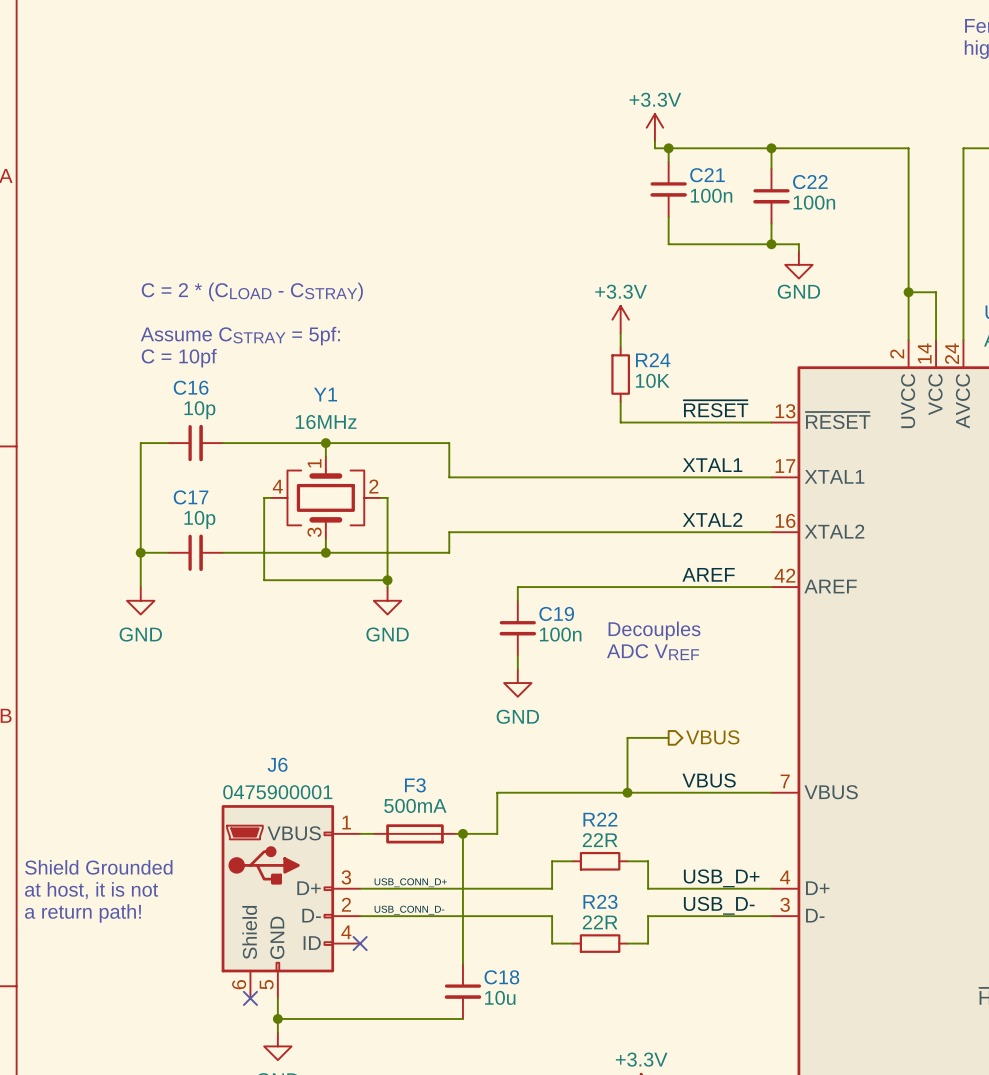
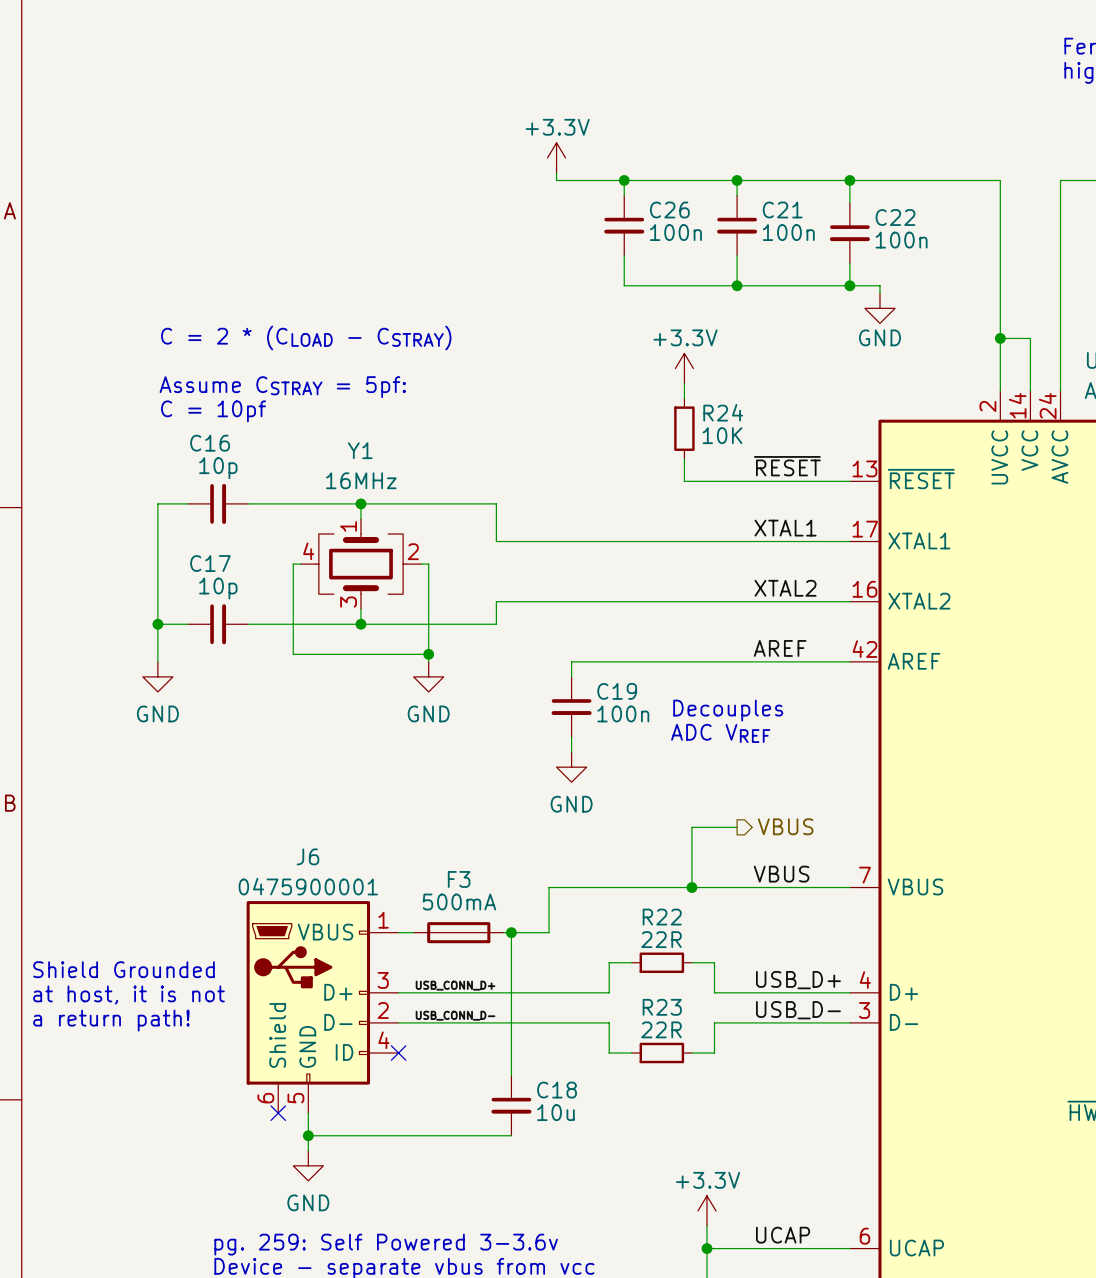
power symbol position: +3.3V (654, 127) -> +3.3V (556, 157)
wire: (654, 141) (654, 148) -> (556, 172) (556, 180) (722, 180)
wire: none -> (624, 180) (624, 195)
junction: none -> (624, 180)
C26: none -> 100n (624, 225)
wire: none -> (624, 255) (624, 285) (737, 285)
junction: none -> (737, 285)

